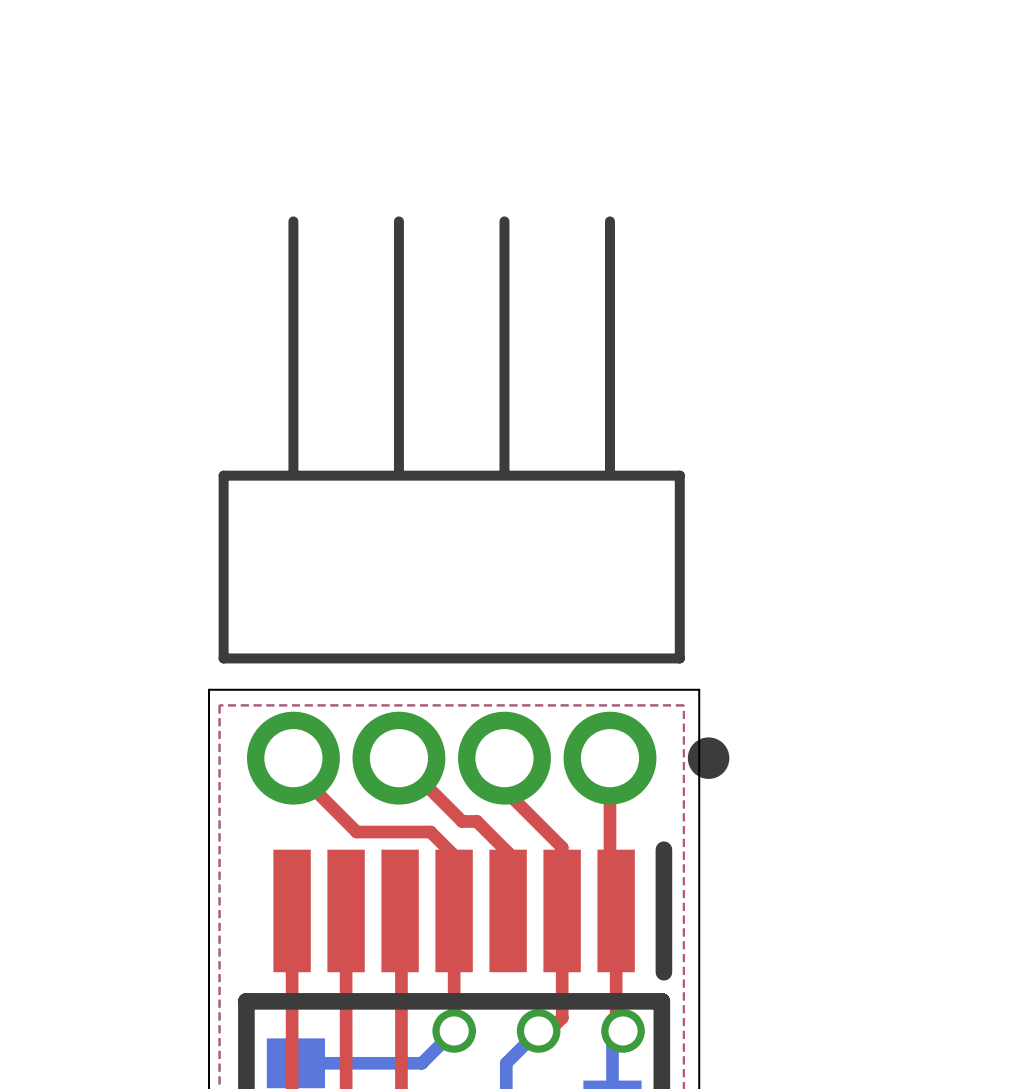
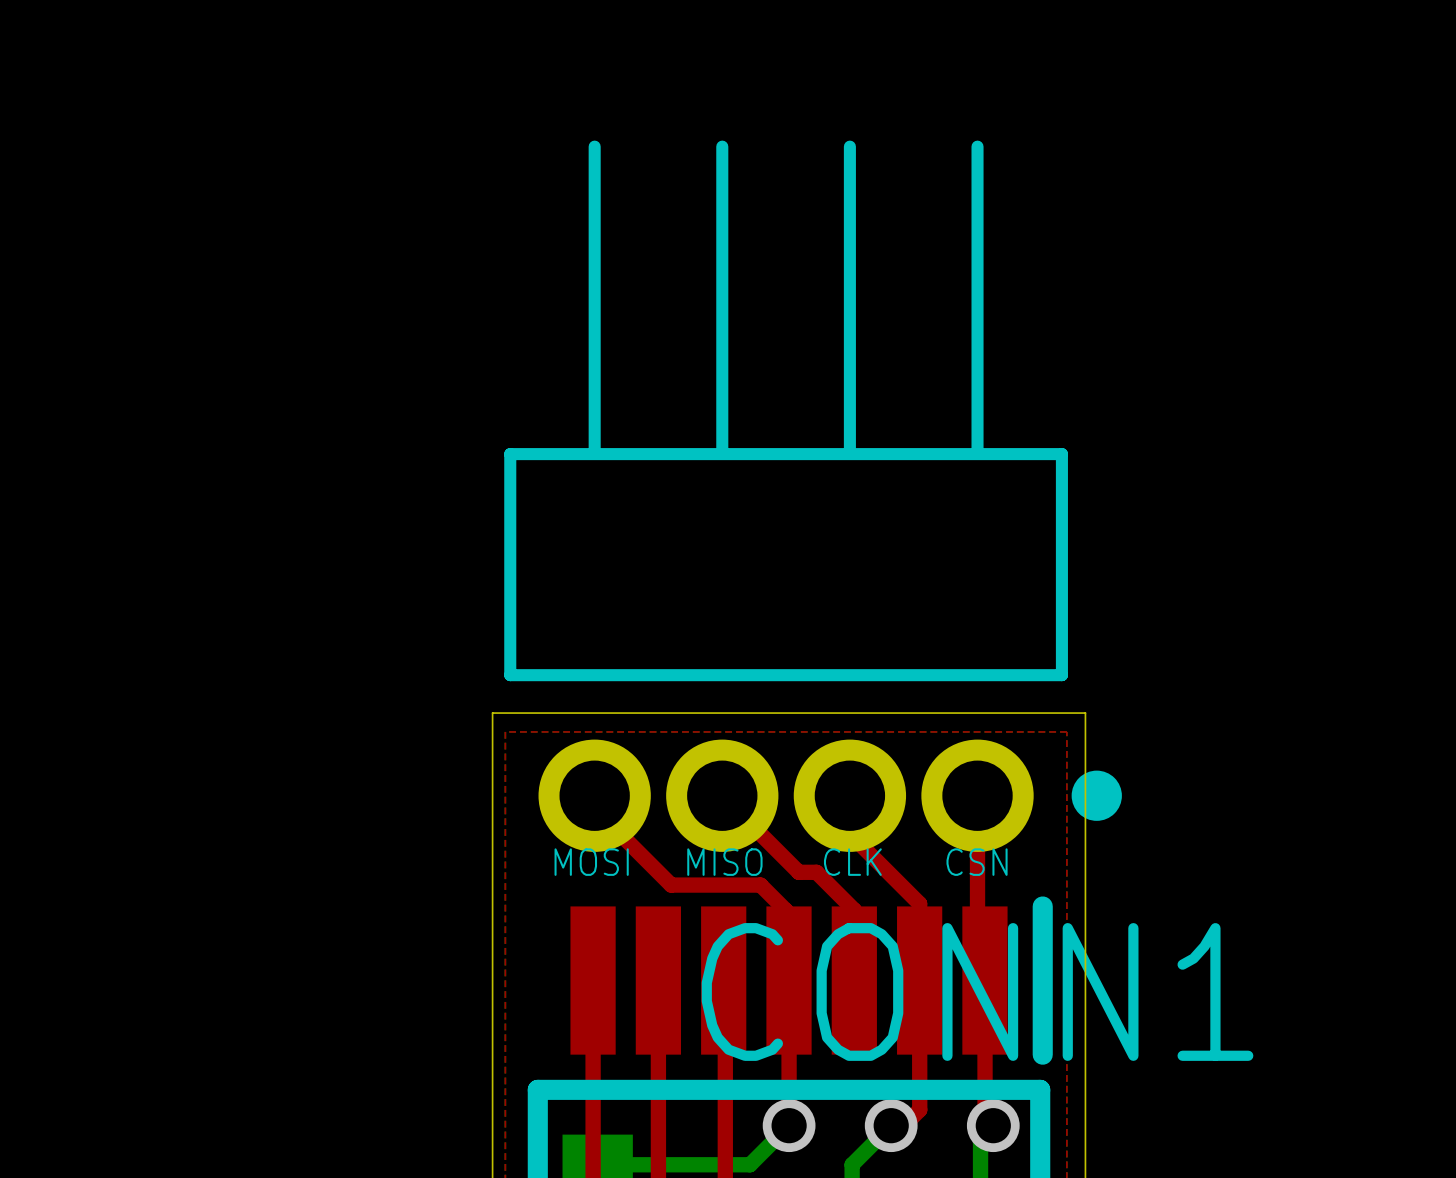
text: none -> MOSI (591, 862)
text: none -> MISO (724, 862)
text: none -> CLK (852, 862)
text: none -> CSN (977, 862)
CONN1 name: none -> CONN1 (977, 991)

